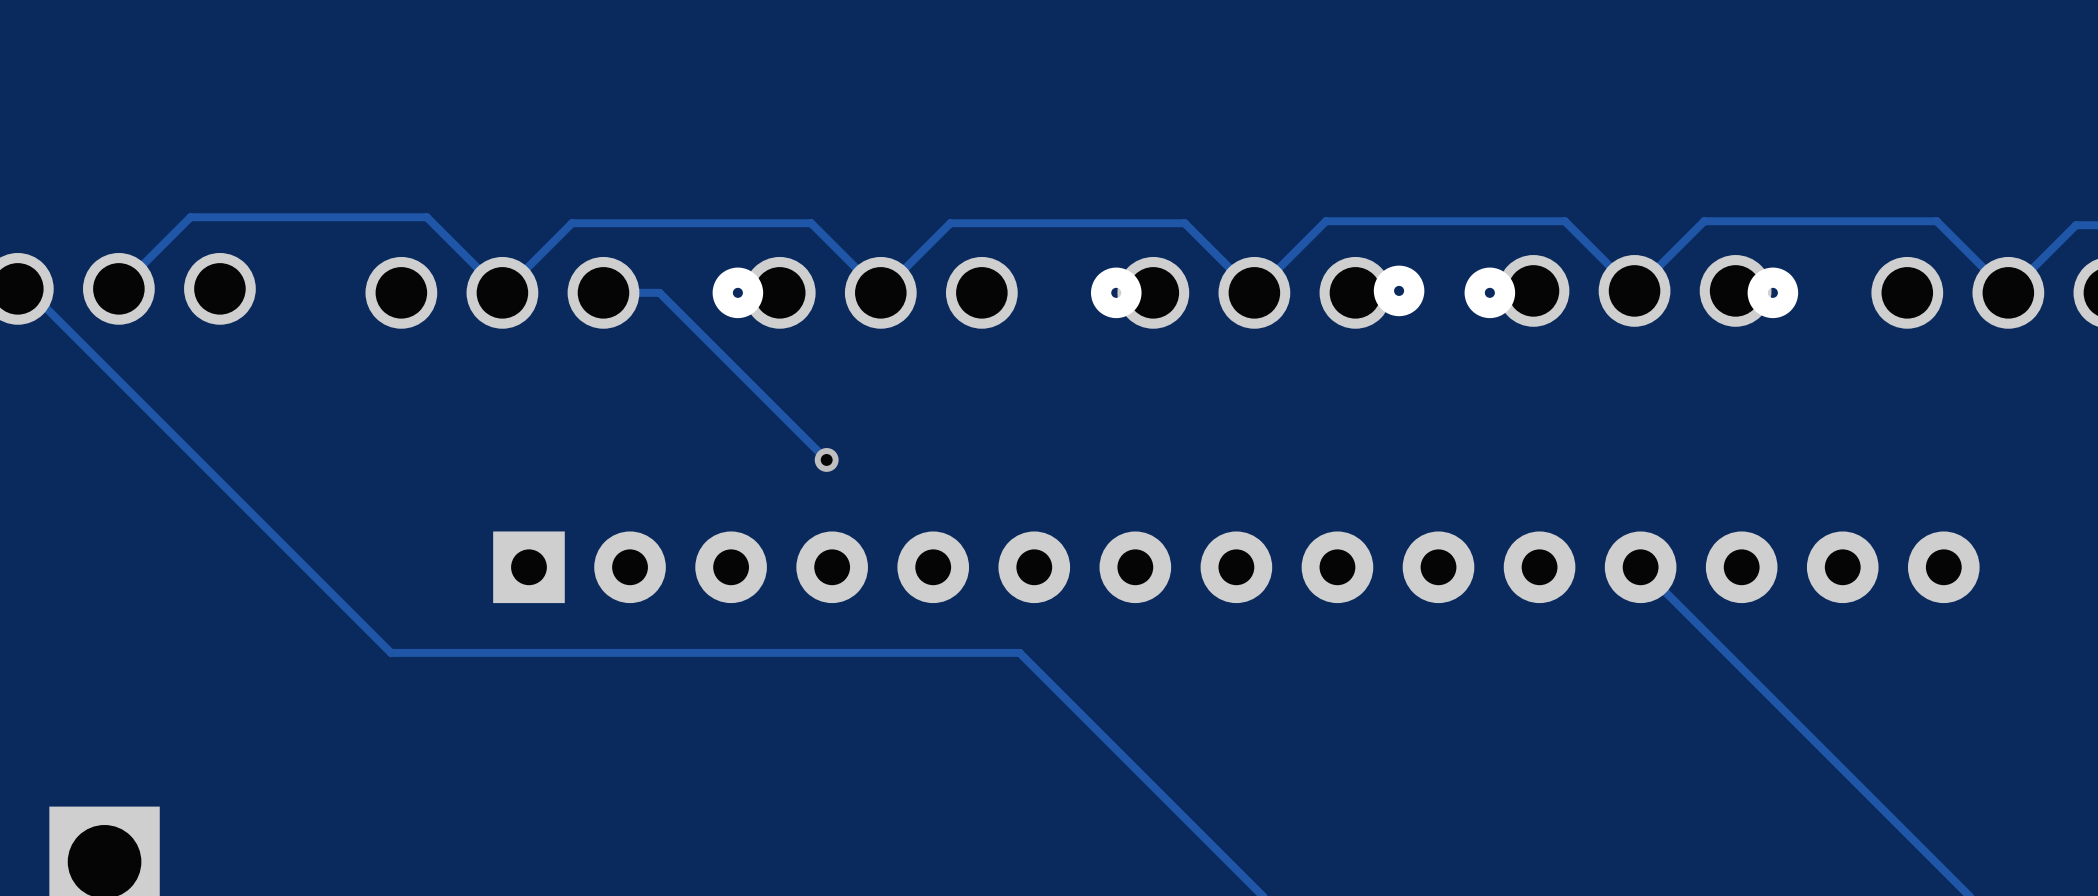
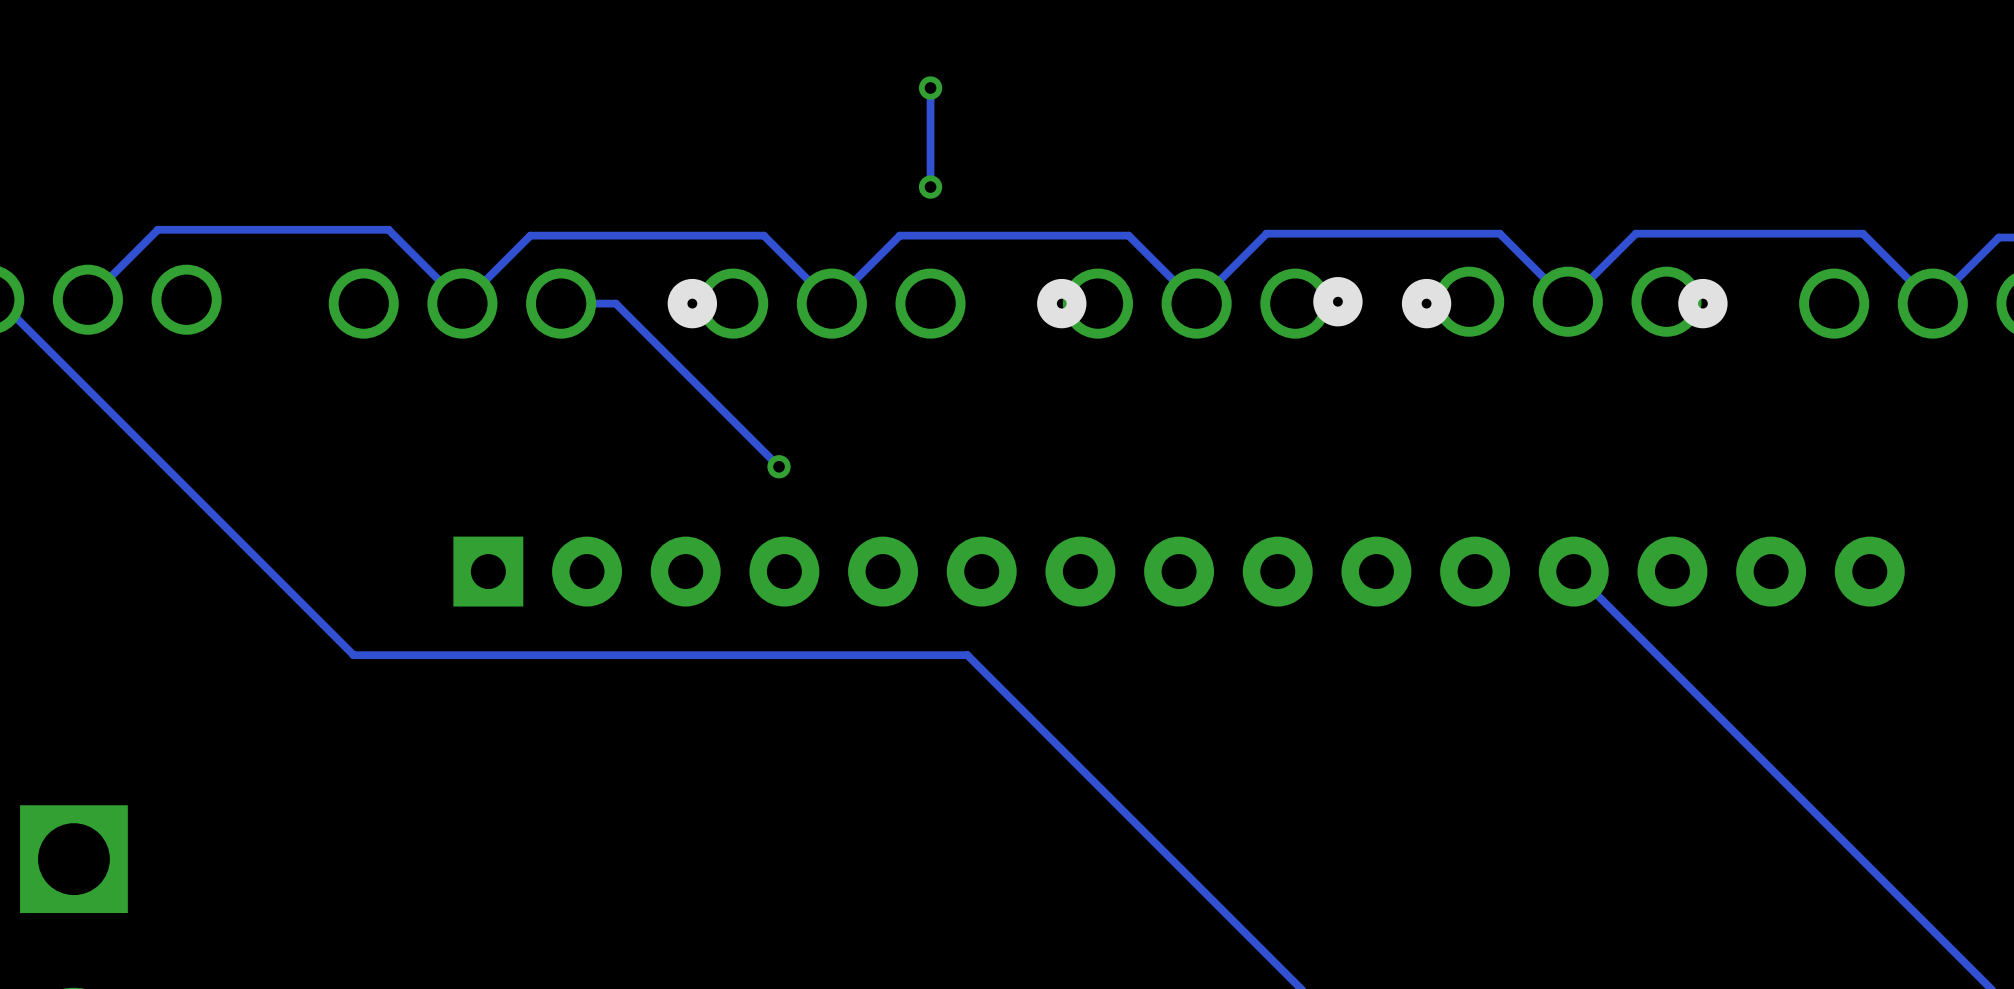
track: none -> (930, 88) (930, 187)
via: none -> (930, 88)
via: none -> (930, 187)

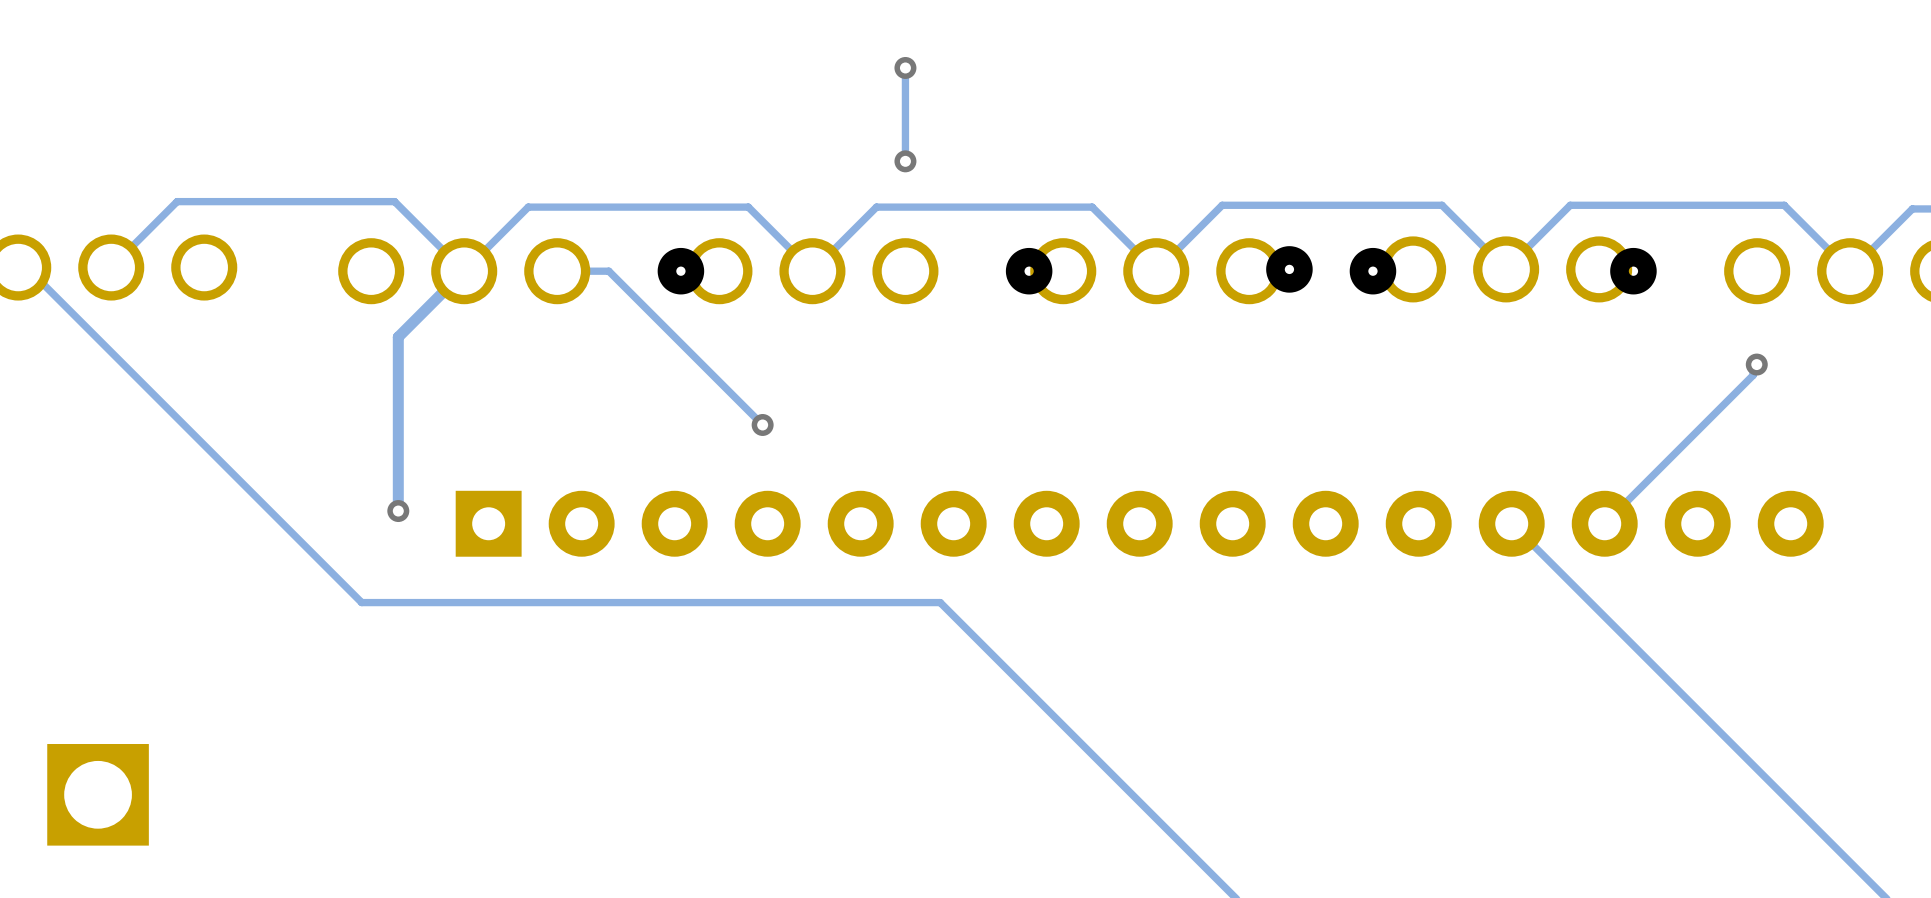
track: none -> (464, 271) (398, 337) (398, 511)
track: none -> (1756, 364) (1753, 368) (1753, 375) (1604, 523)
via: none -> (1756, 364)
via: none -> (398, 511)

